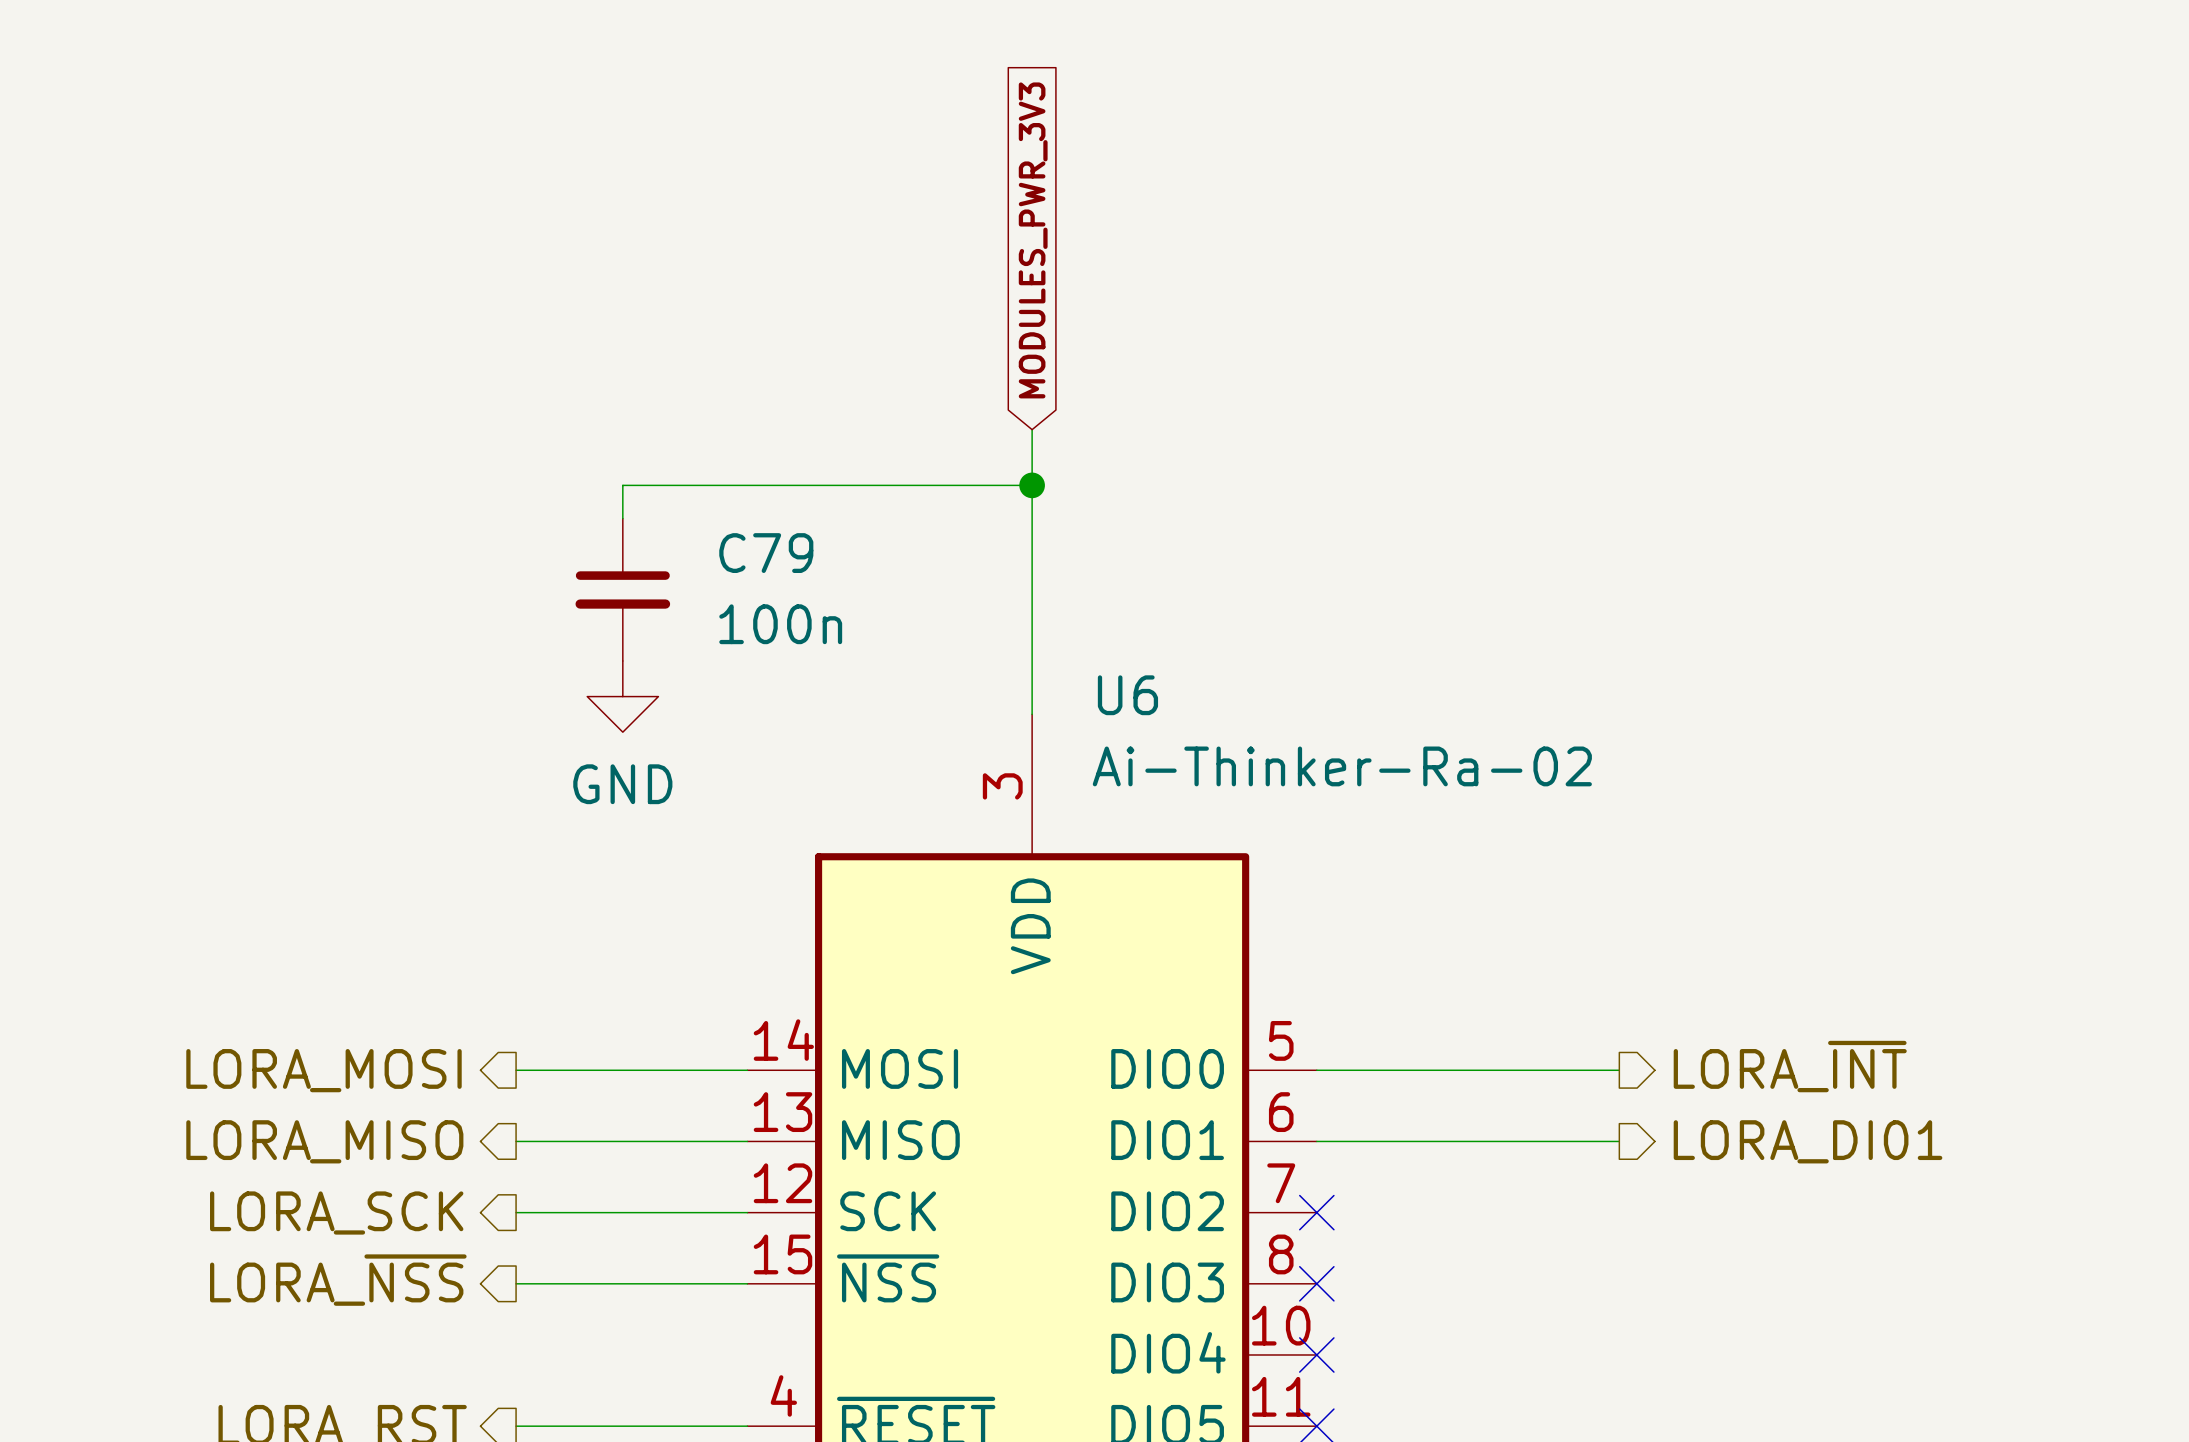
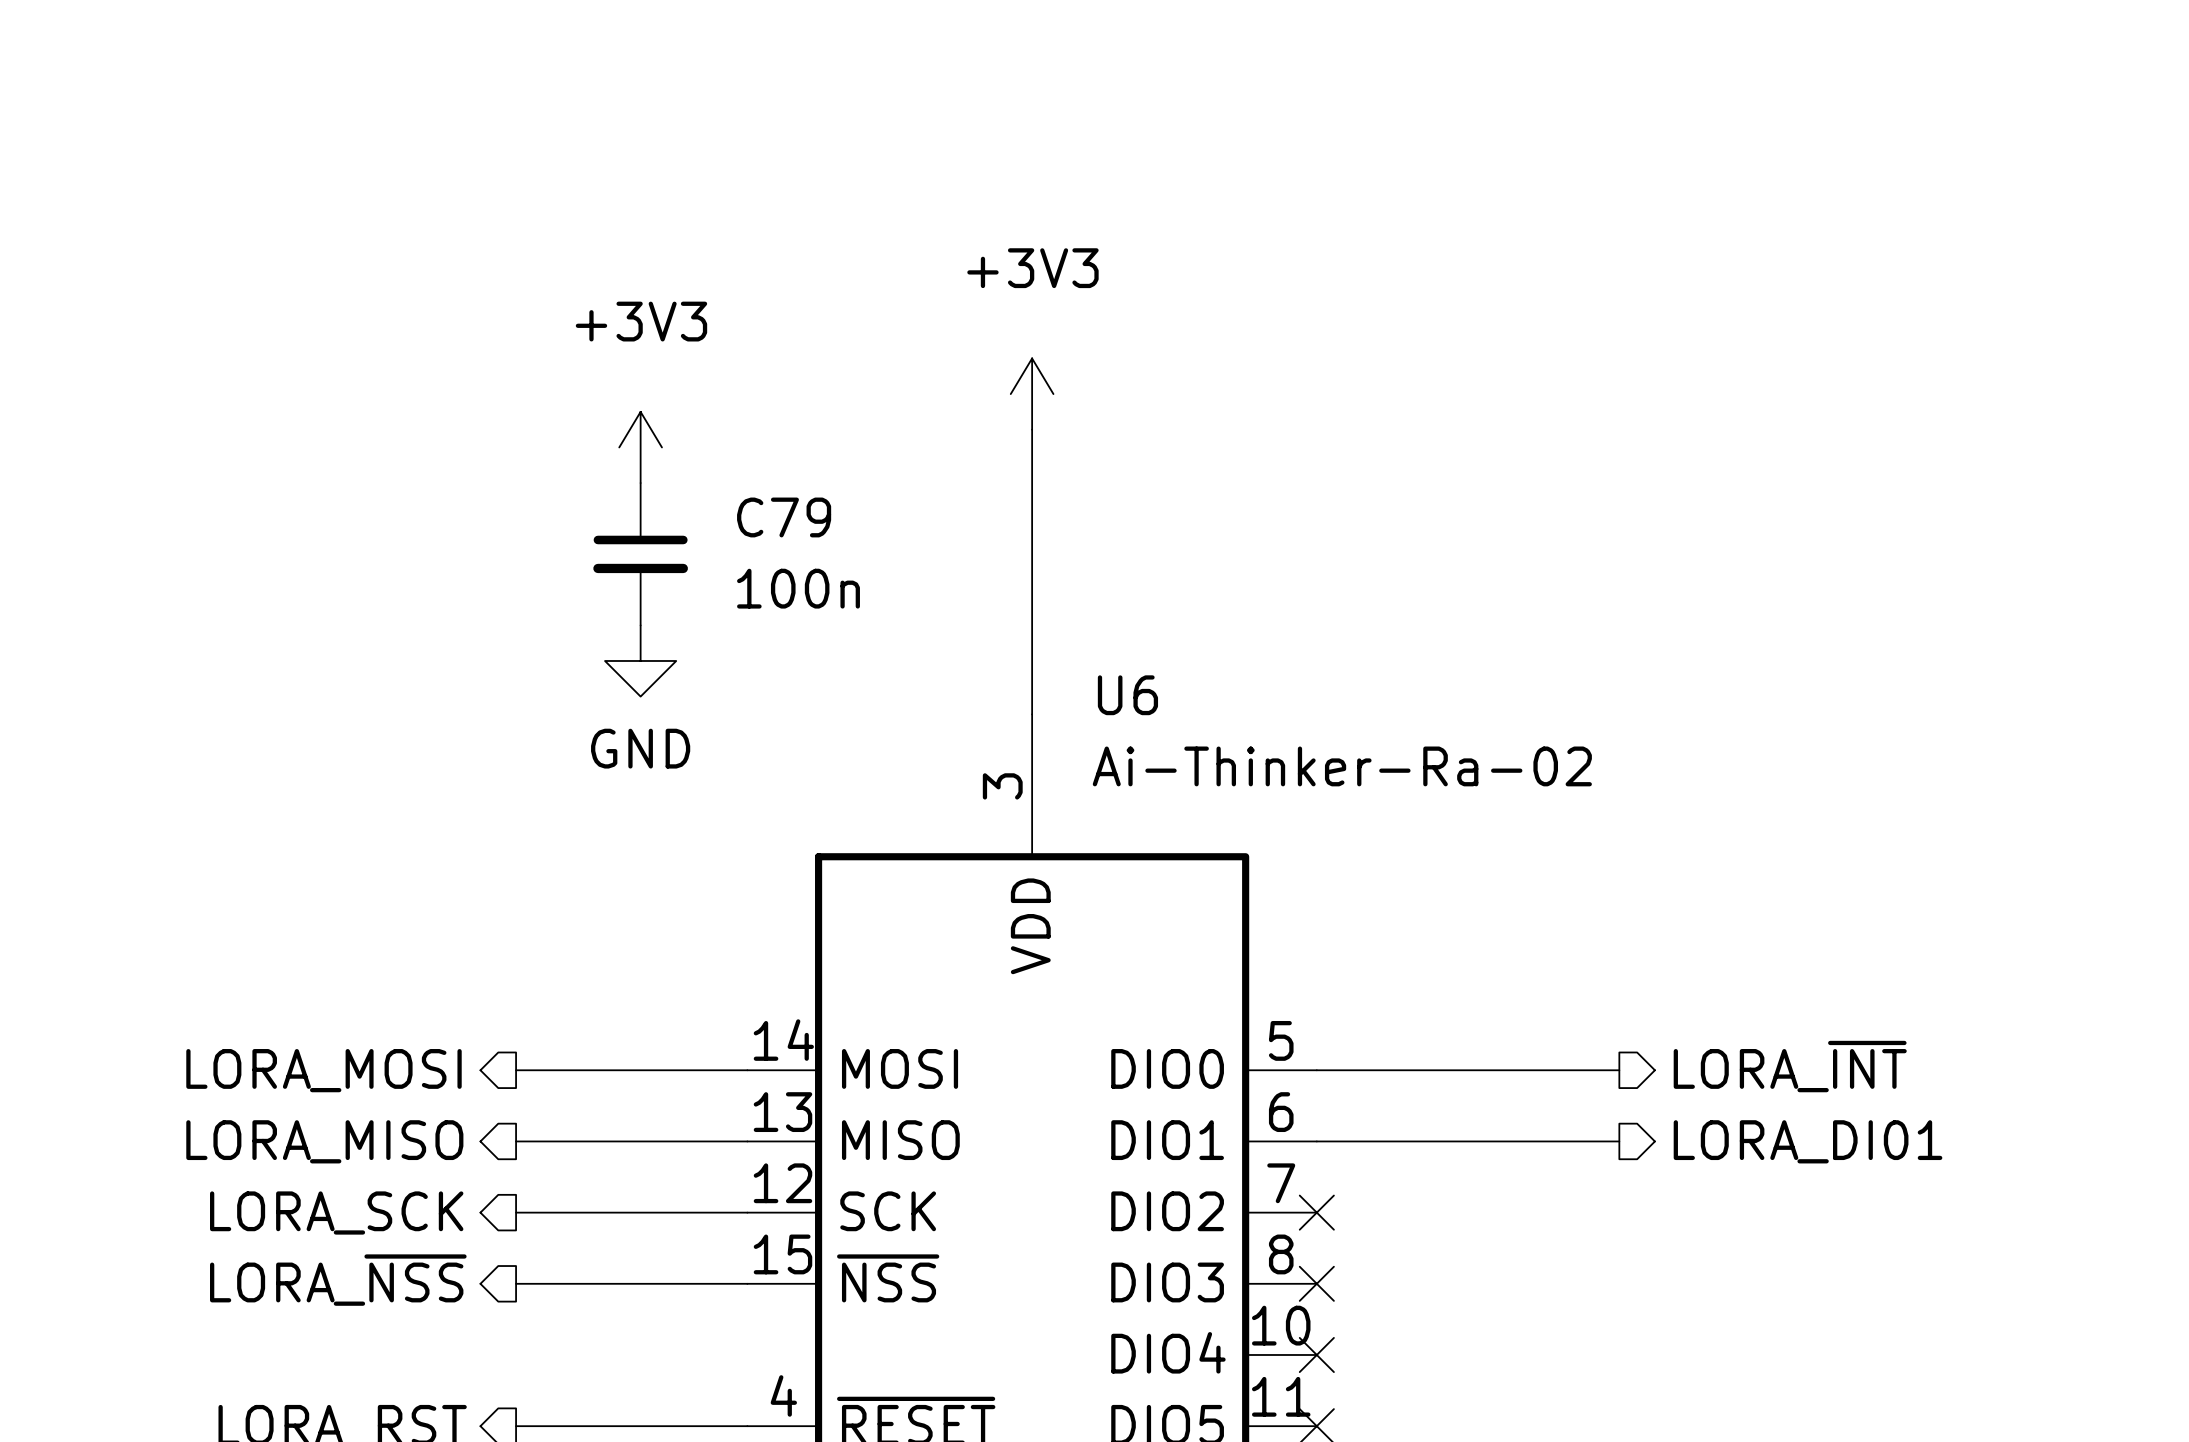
global label: MODULES_PWR_3V3 (1033, 240) -> none
power symbol: none -> +3V3 (1032, 394)
power symbol: none -> +3V3 (640, 447)
wire: (1032, 485) (622, 485) (622, 518) -> none
junction: (1032, 485) -> none
C79 position: (622, 589) -> (640, 554)
power symbol position: GND (622, 696) -> GND (640, 660)

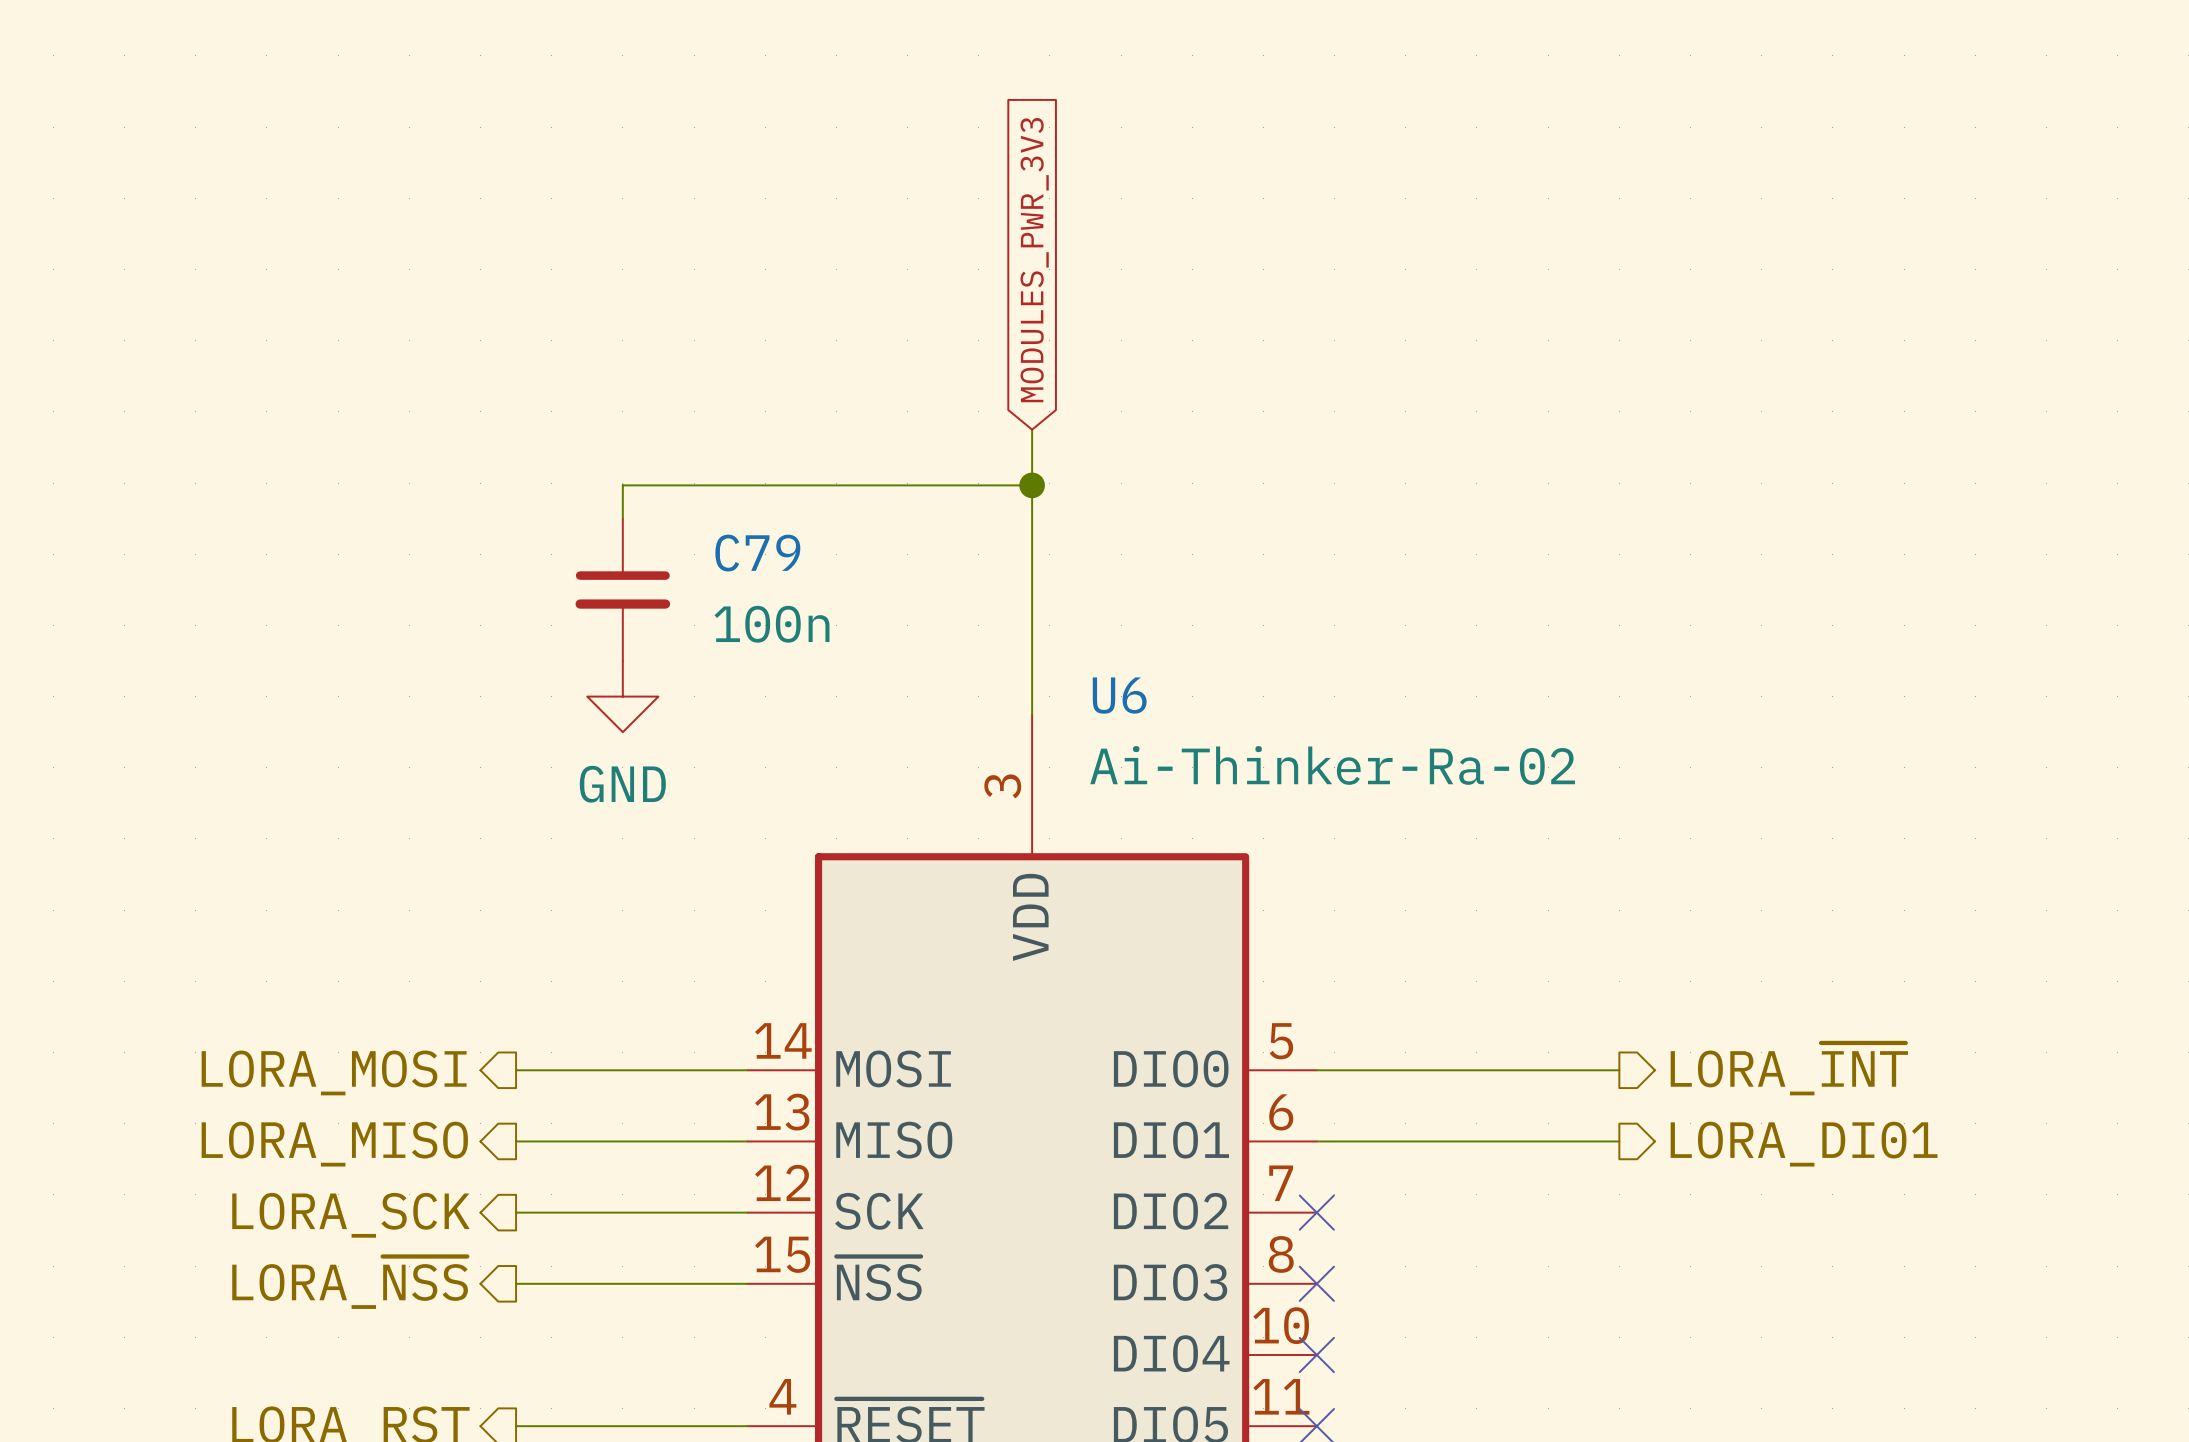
global label: none -> MODULES_PWR_3V3 (1034, 260)
power symbol: +3V3 (1032, 394) -> none
power symbol: +3V3 (640, 447) -> none
wire: none -> (1032, 485) (622, 485) (622, 518)
junction: none -> (1032, 485)
C79 position: (640, 554) -> (622, 589)
power symbol position: GND (640, 660) -> GND (622, 696)

